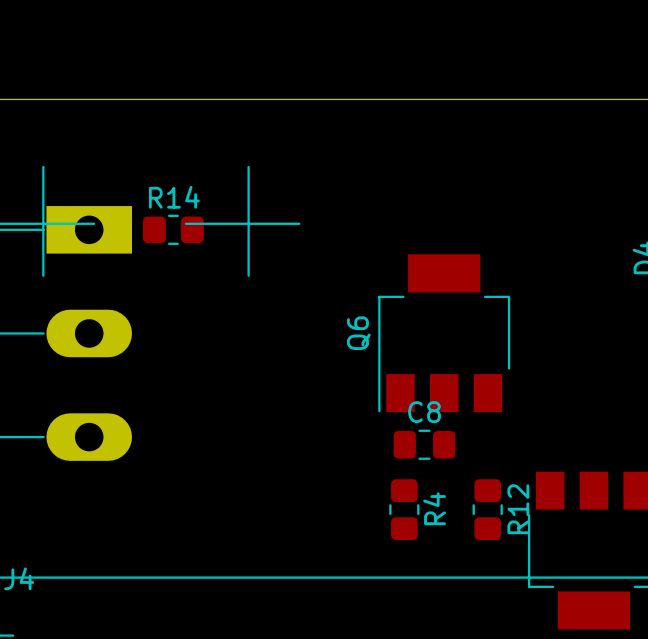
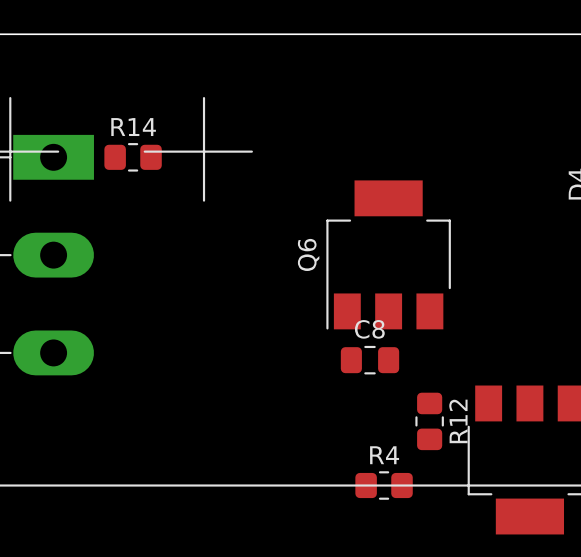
R4 name position: R4 (434, 508) -> R4 (384, 455)
R4 rotation: 0° (404, 509) -> 90° clockwise (384, 485)
R4 position: (404, 509) -> (384, 485)

